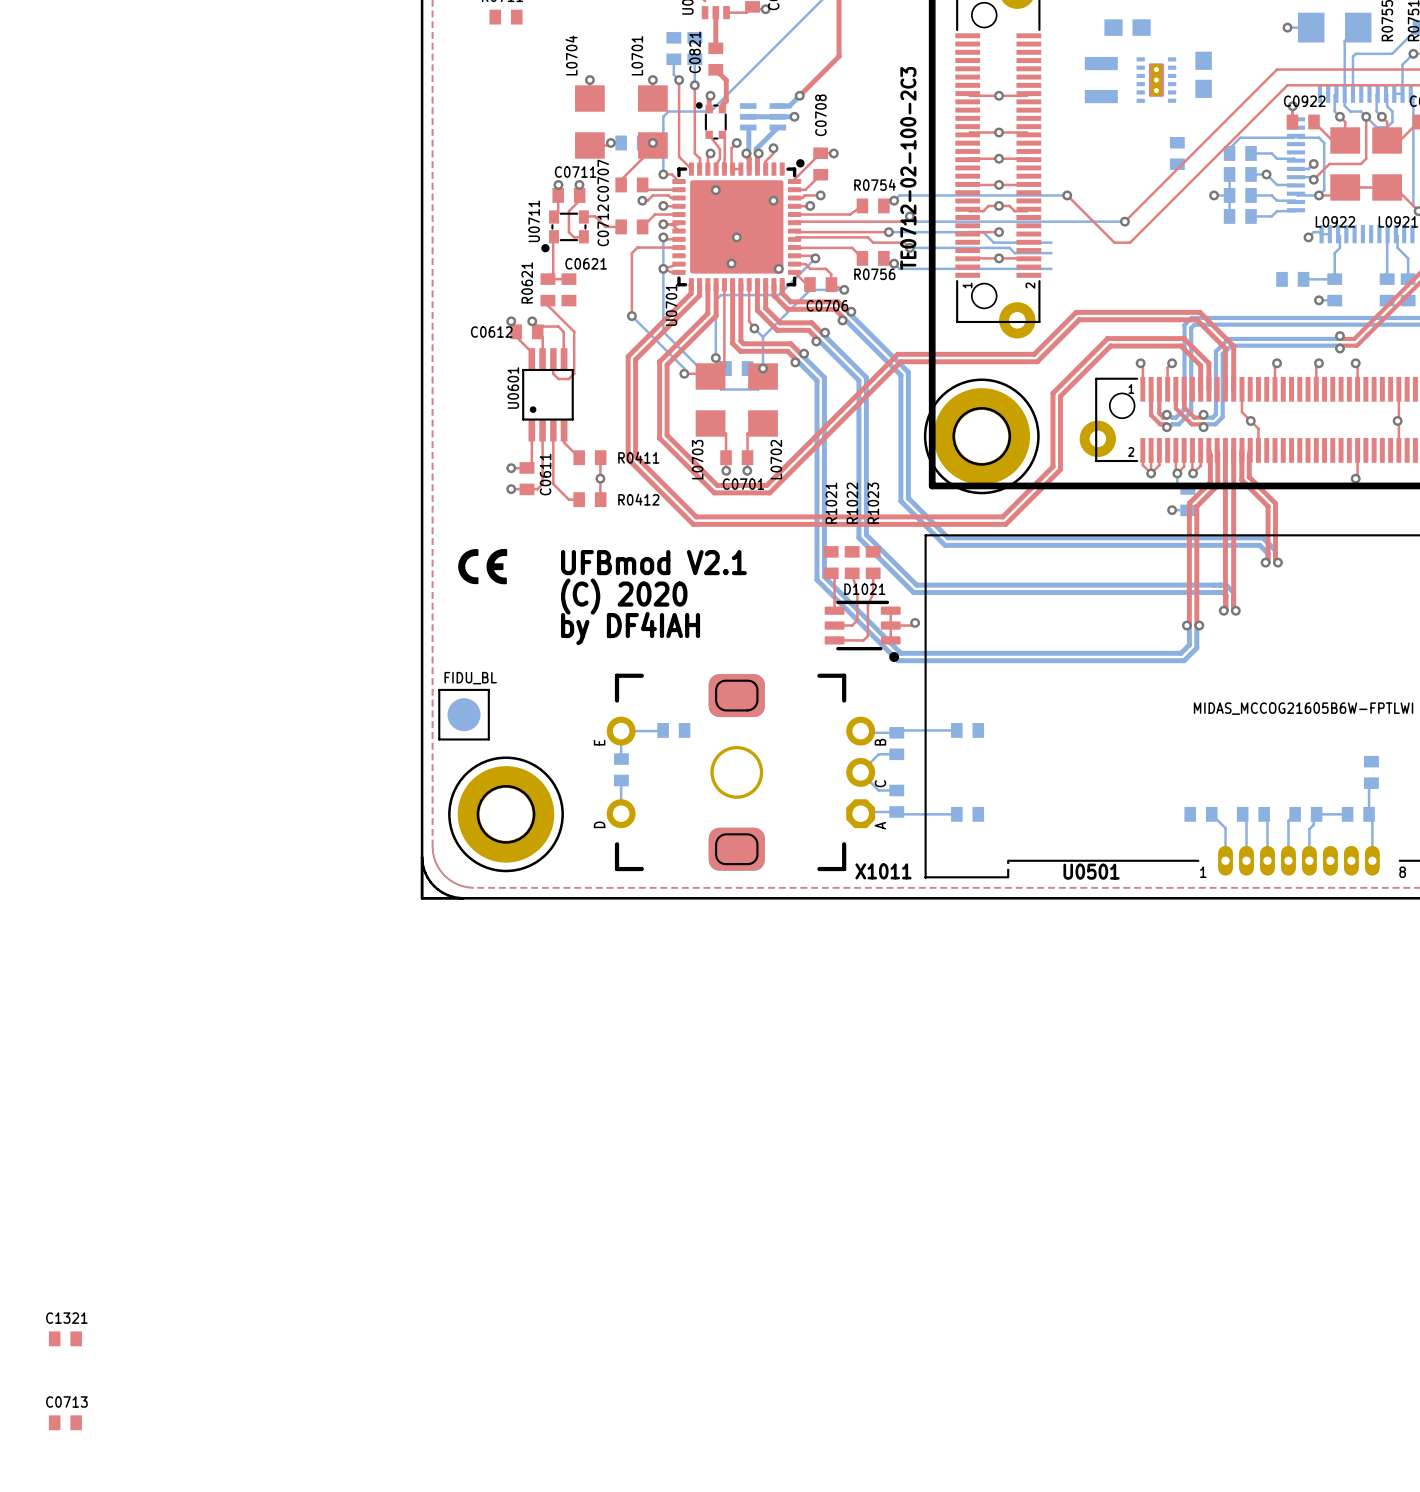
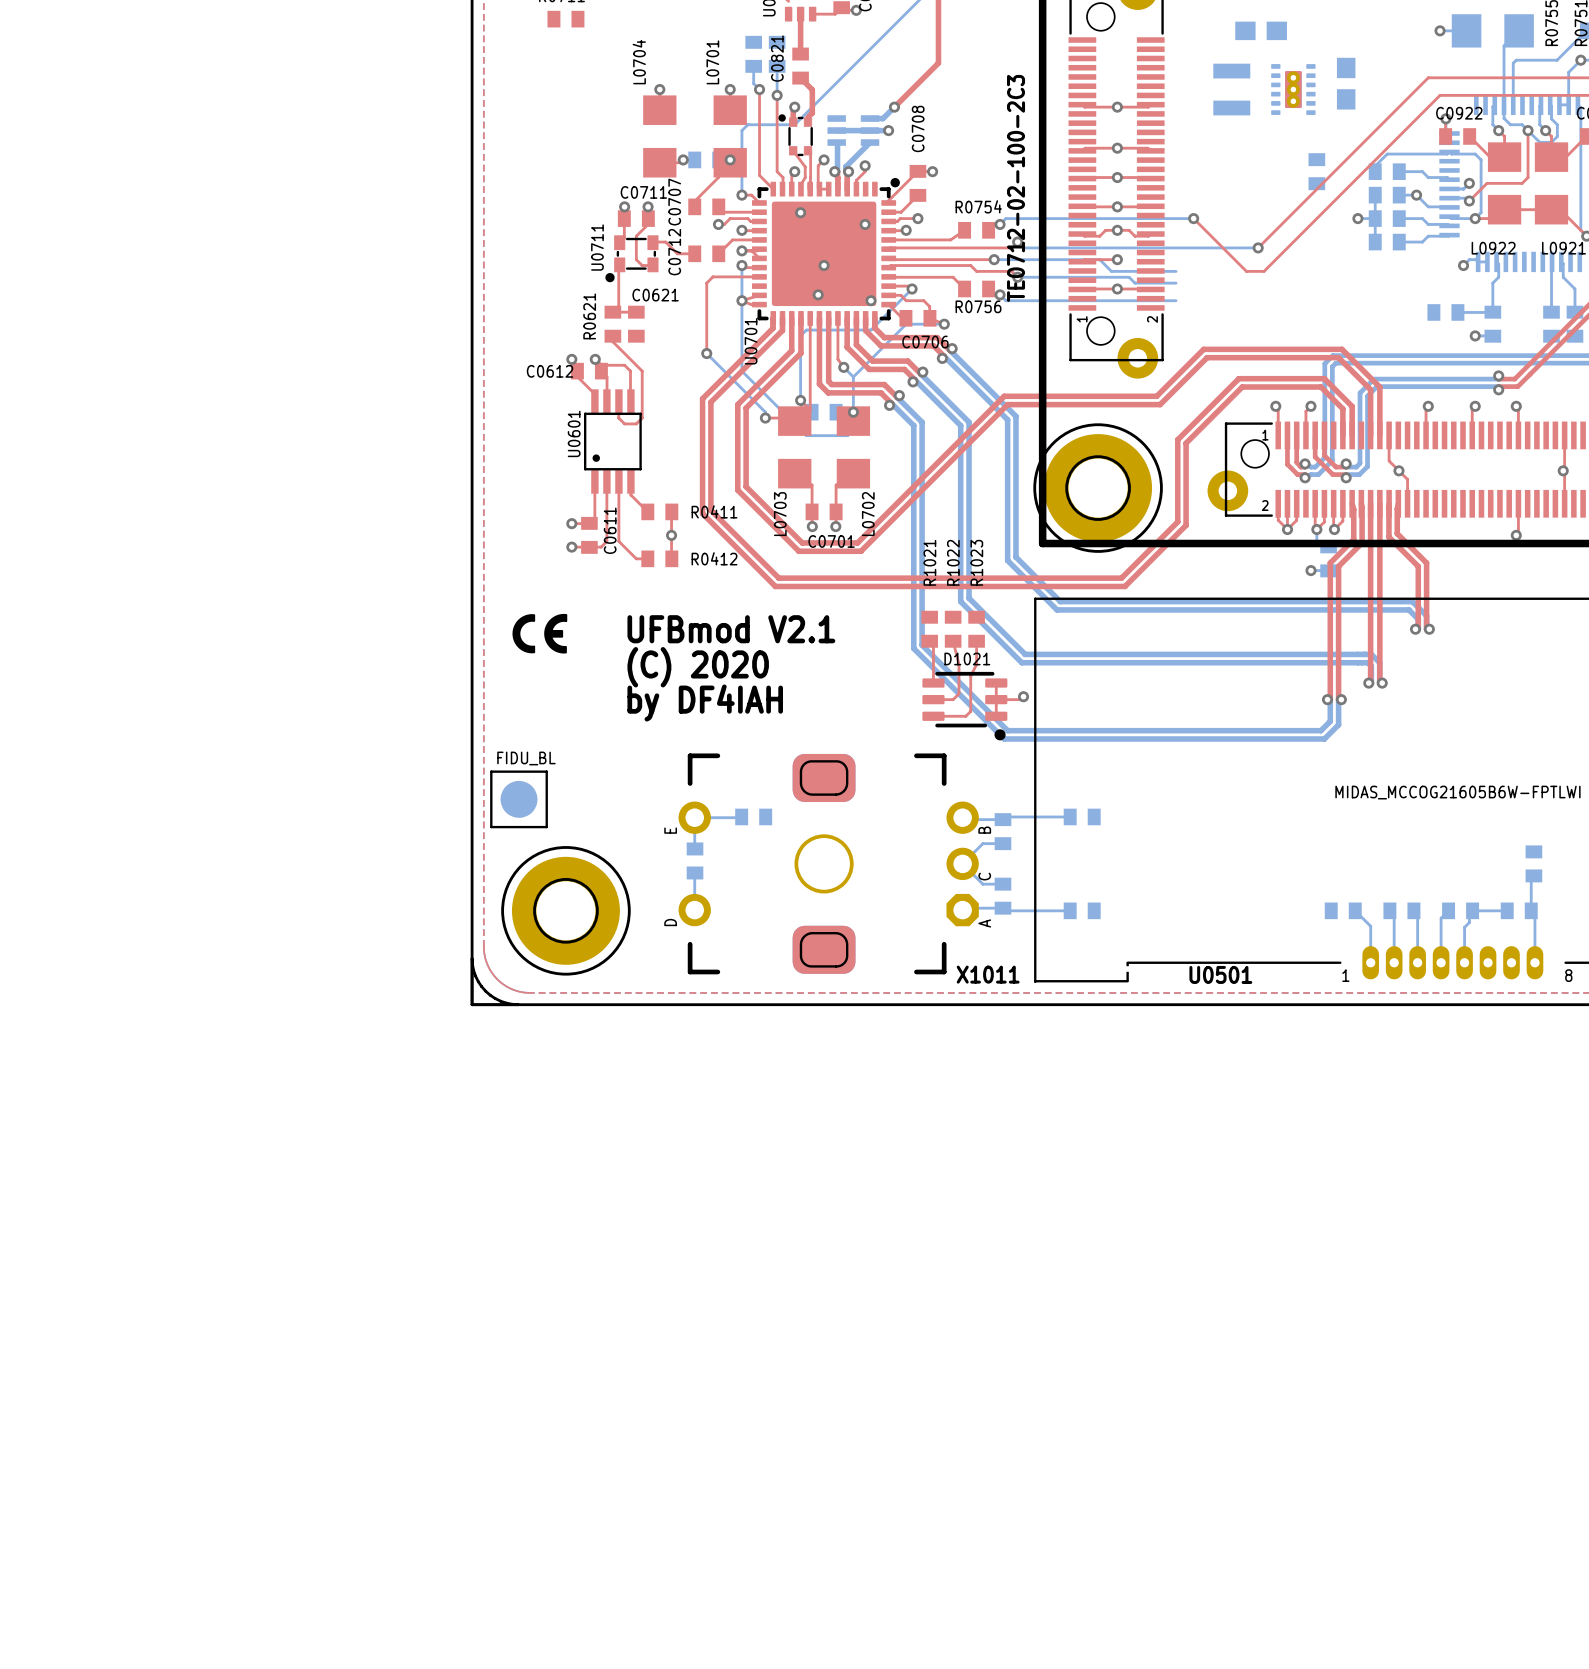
C1321: (65, 1338) -> none
C0713: (65, 1422) -> none

